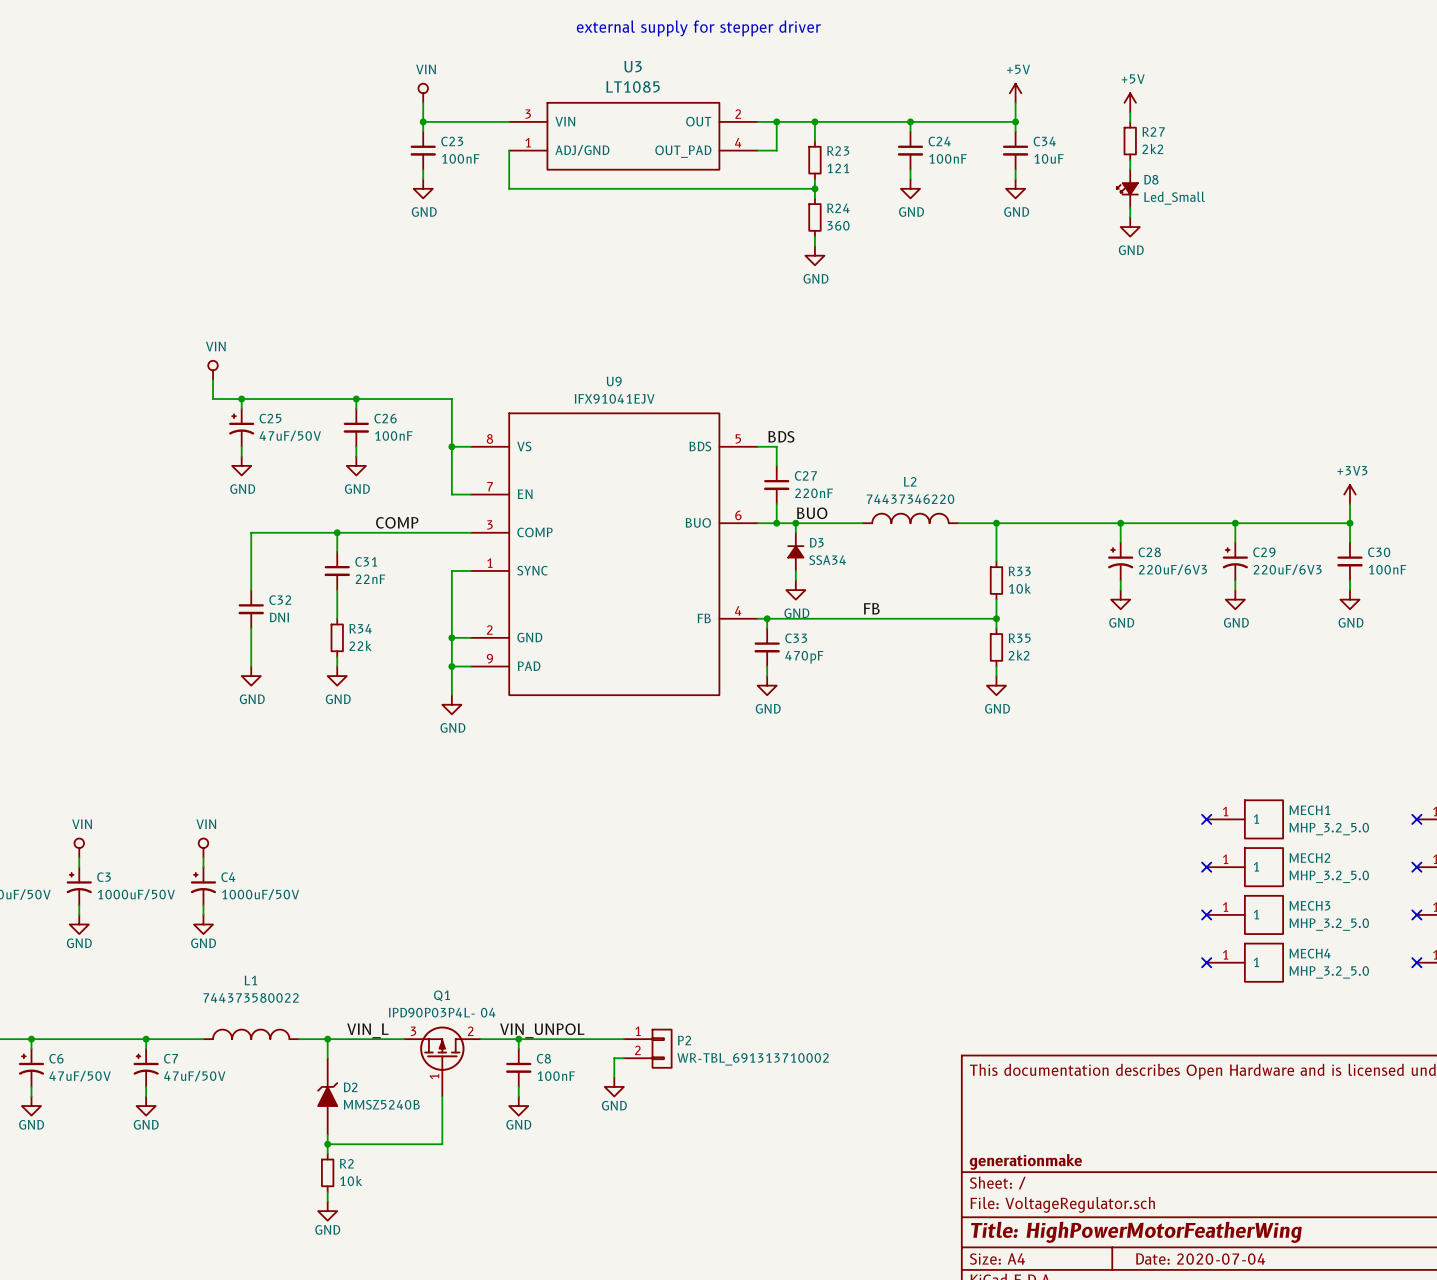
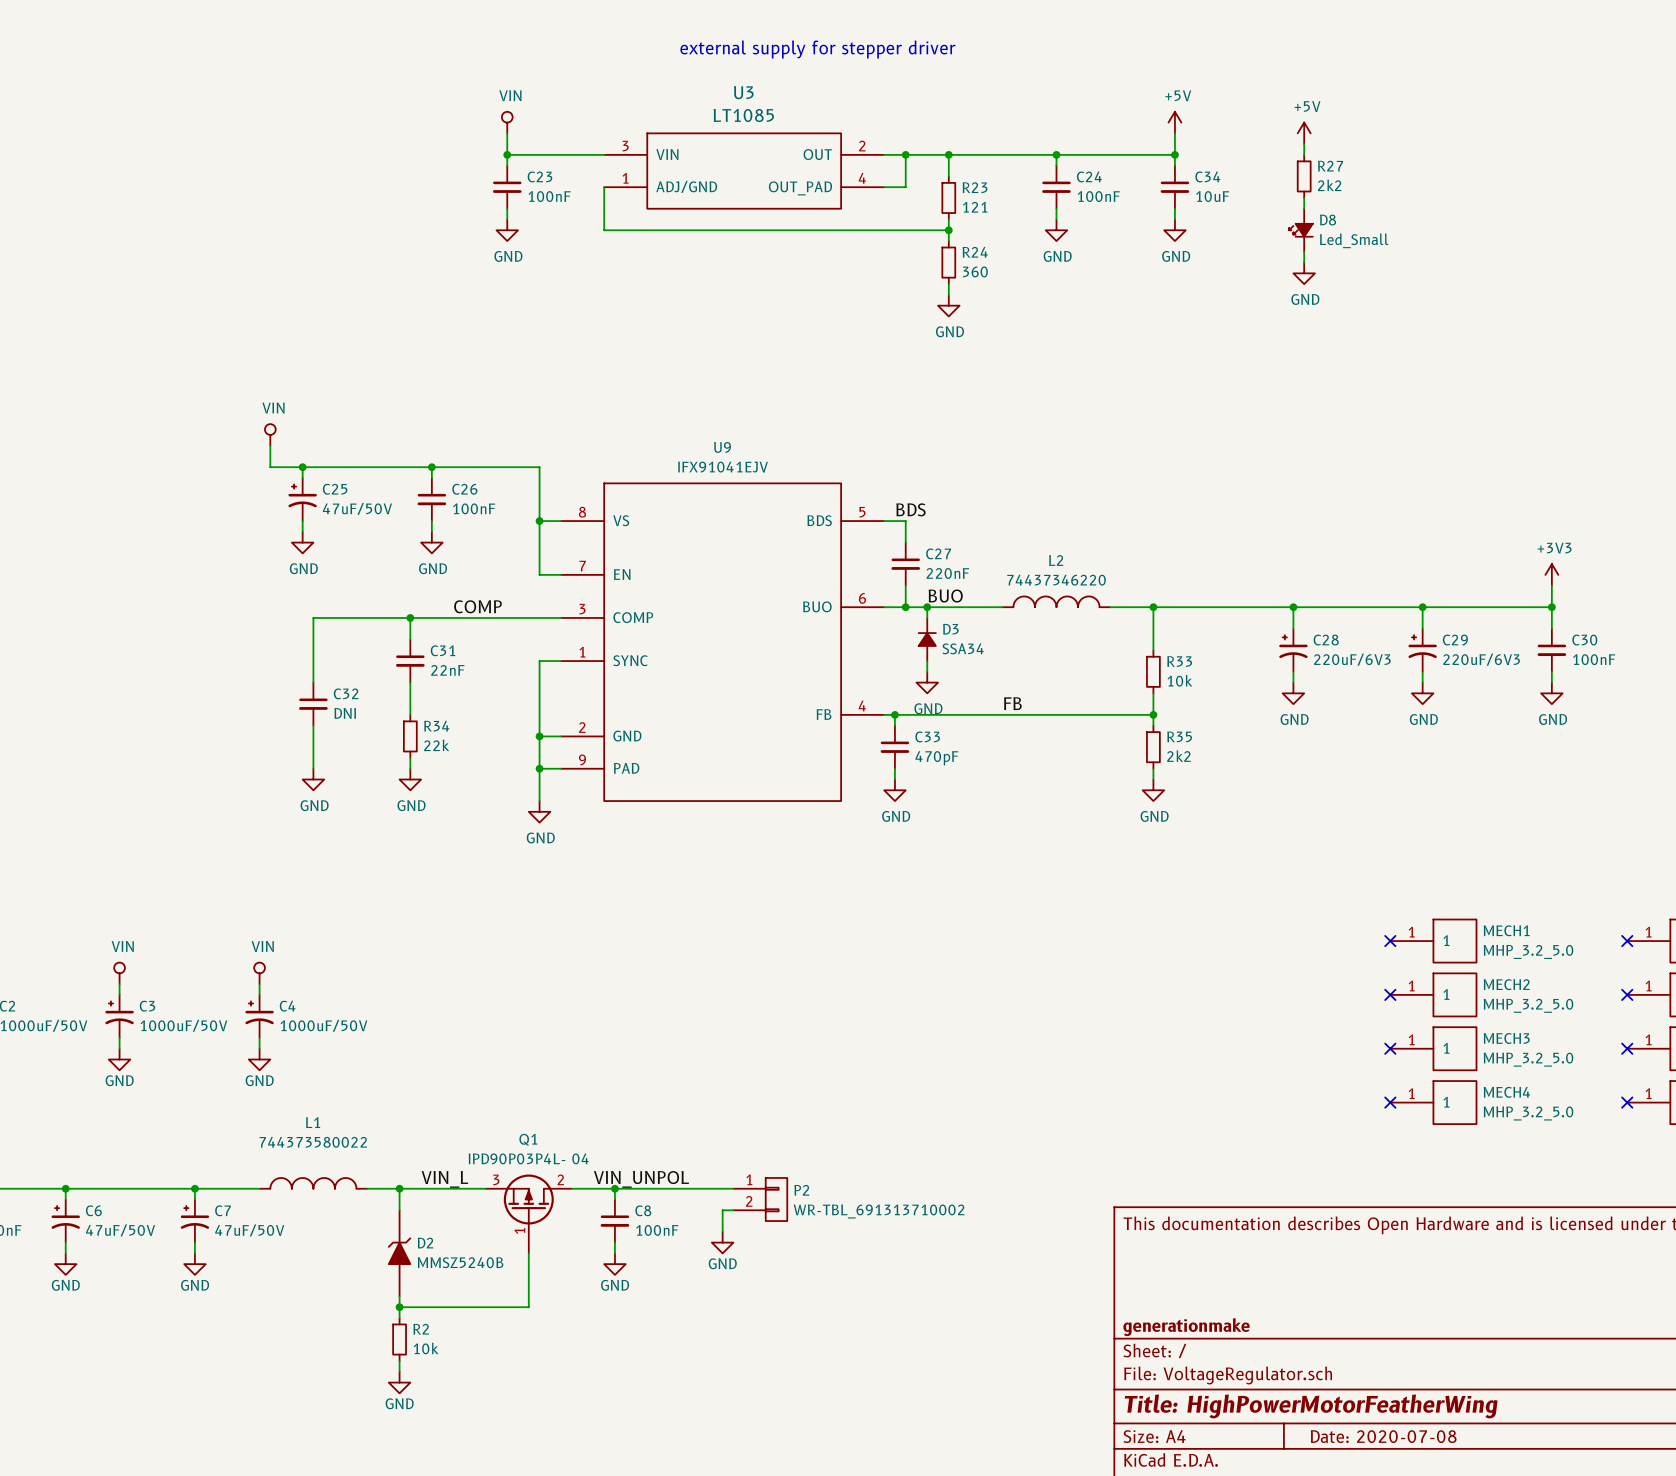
title block: Date: 2020-07-04 (1200, 1259) -> Date: 2020-07-08 (1383, 1436)

